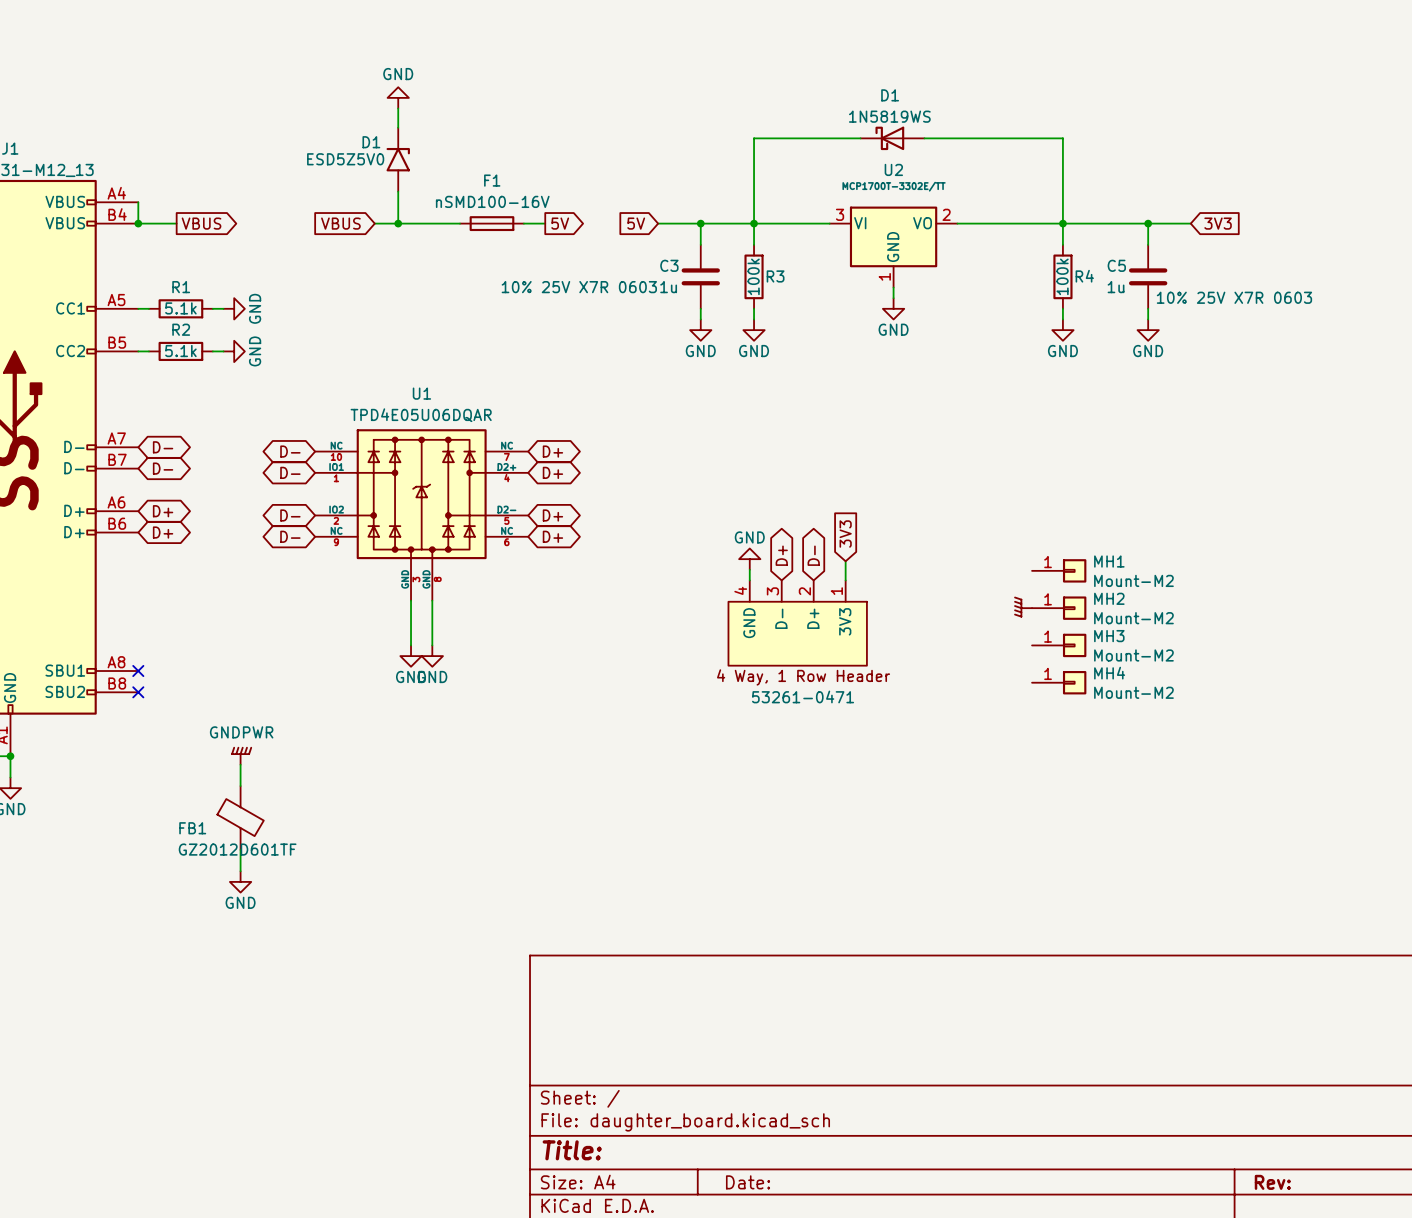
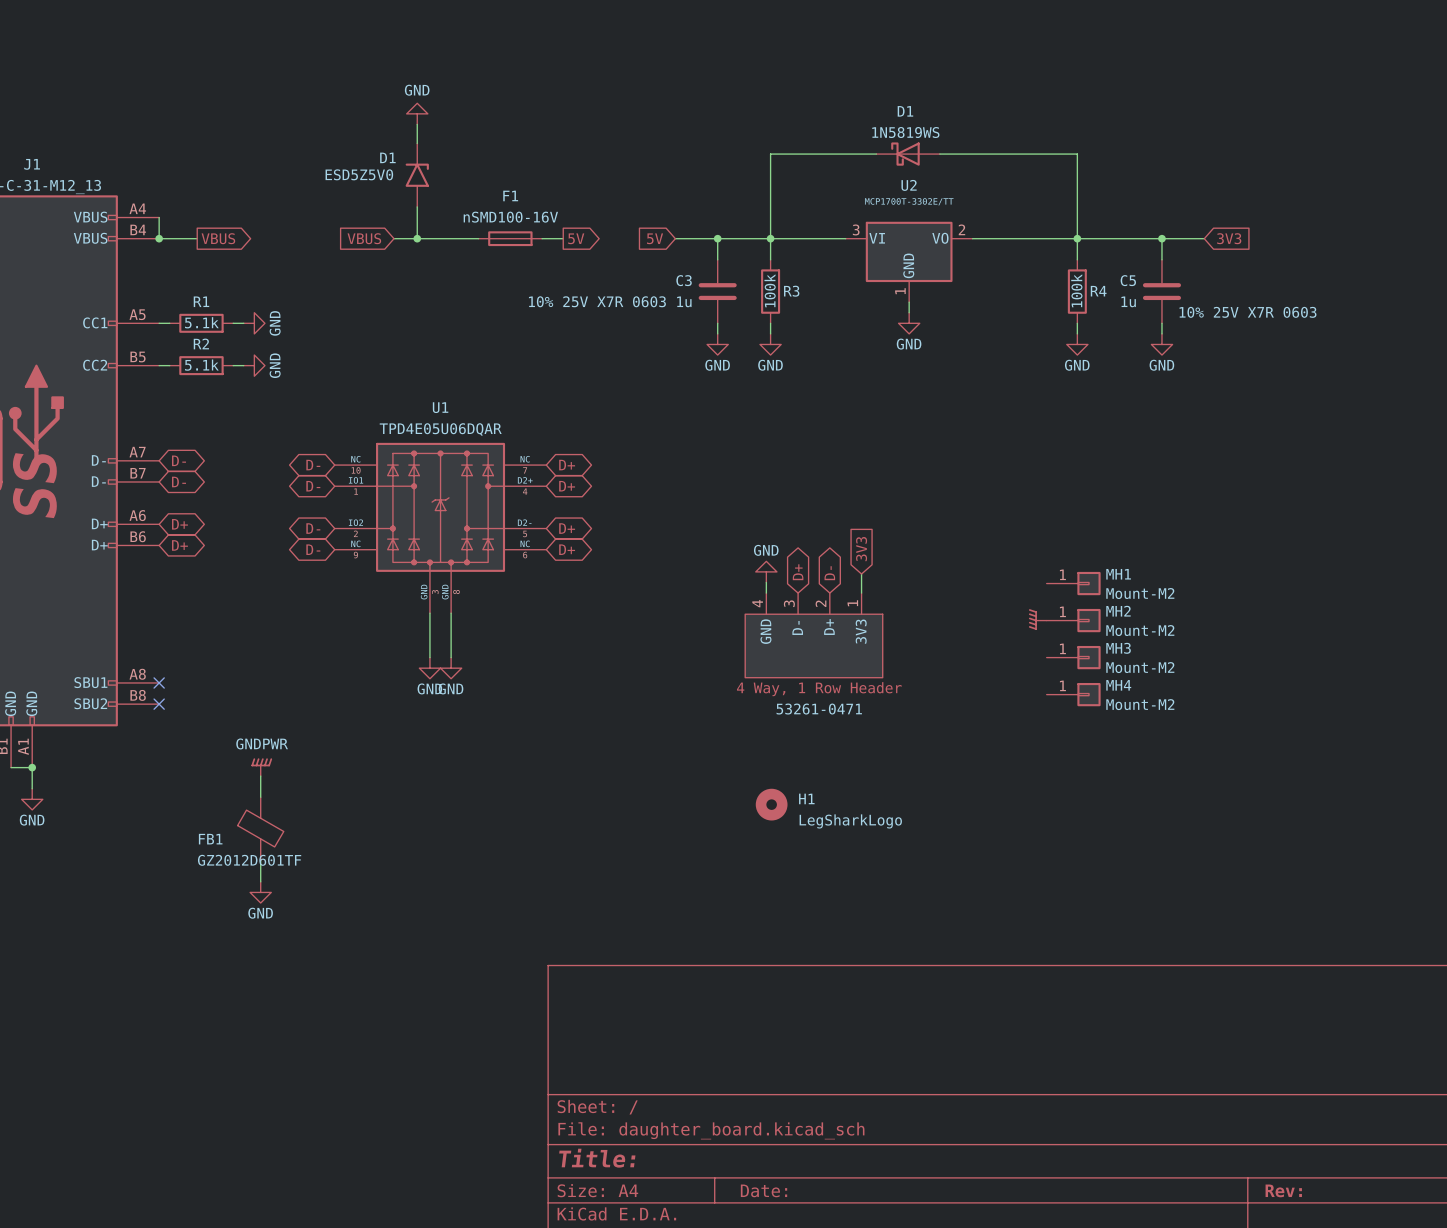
H1: none -> LegSharkLogo (771, 804)

